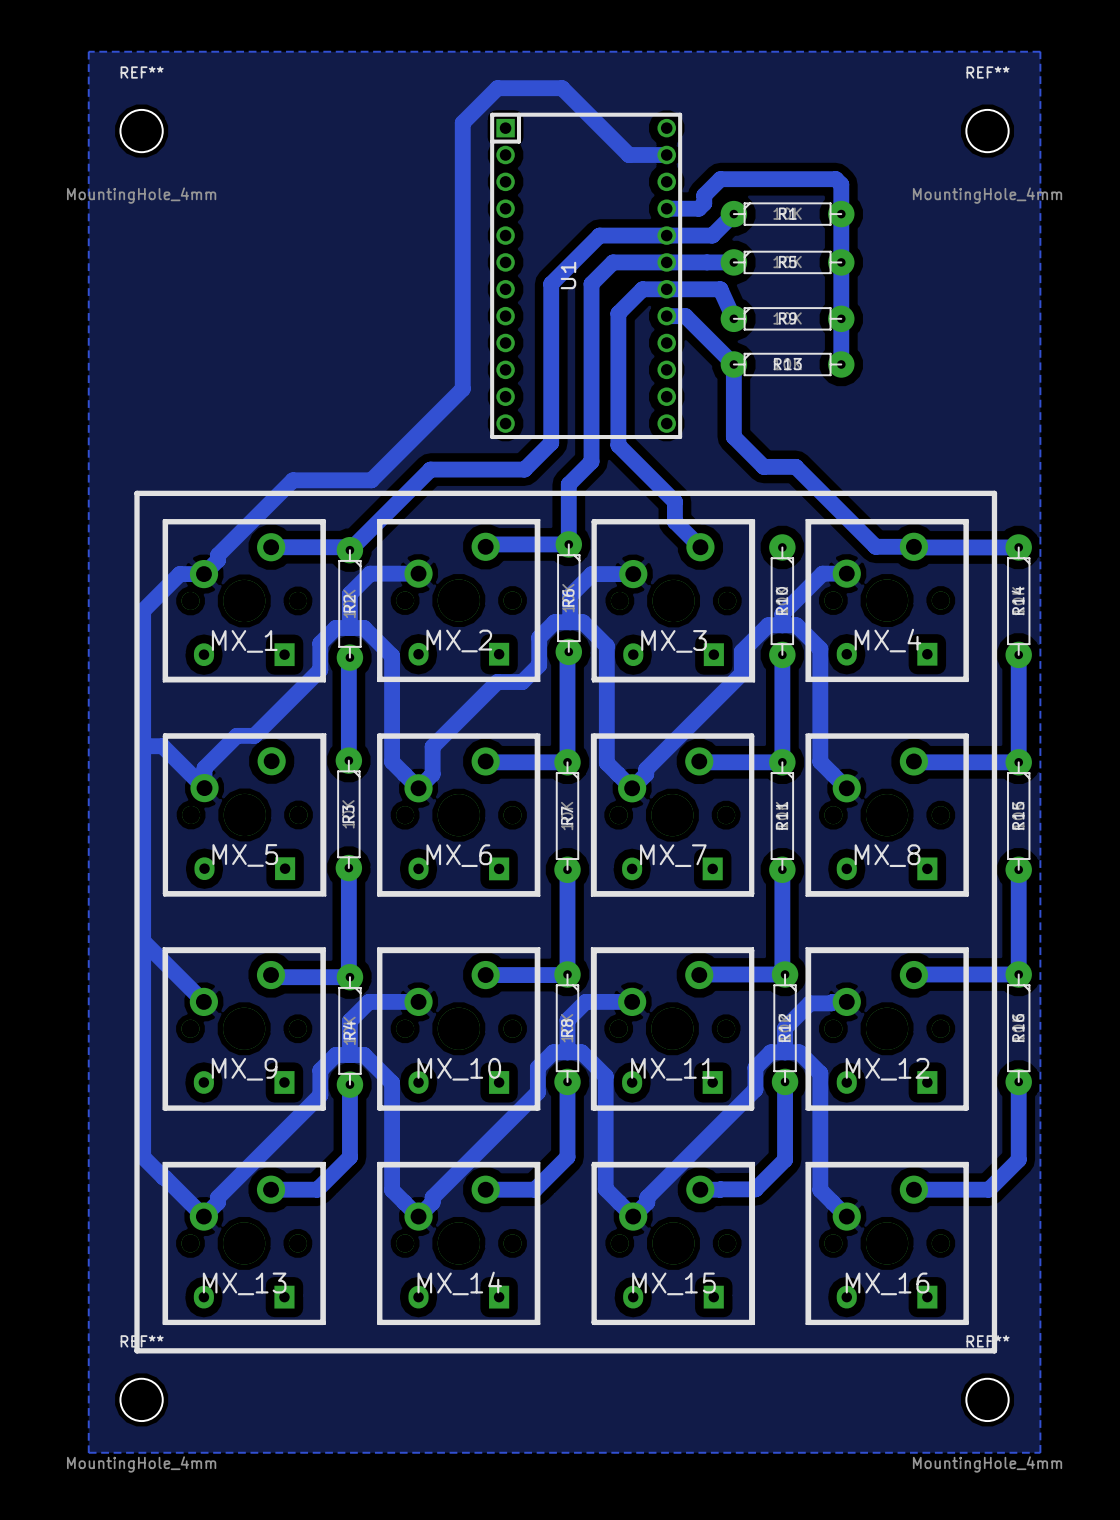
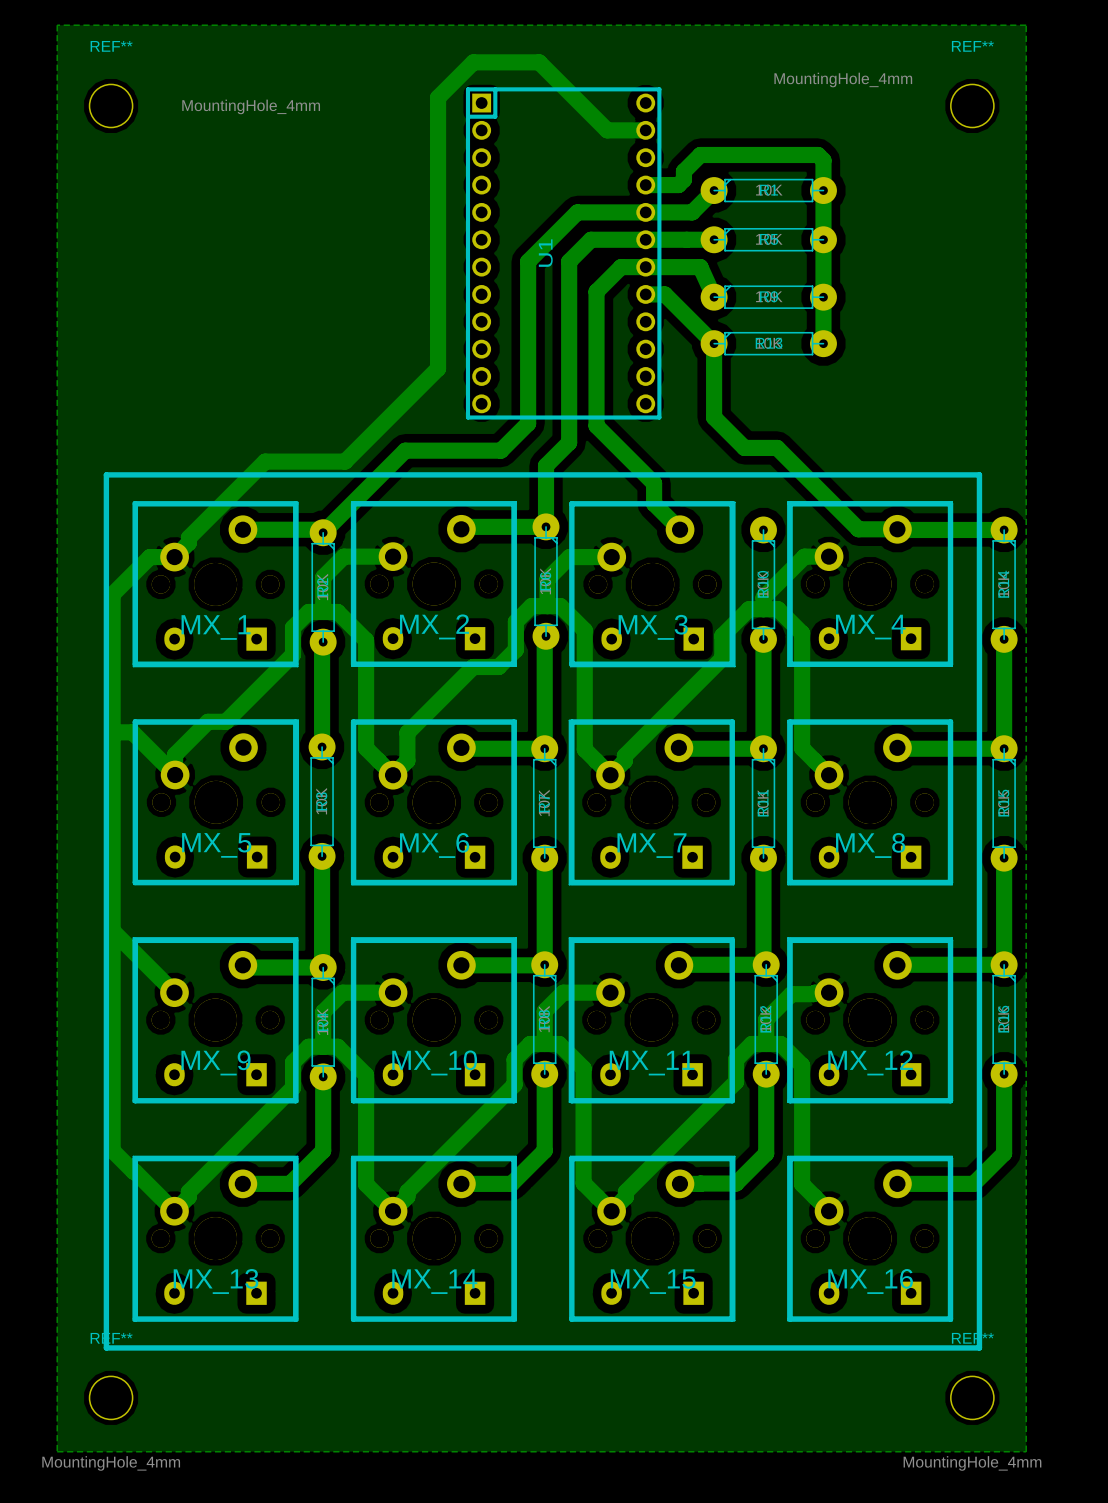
REF** value position: MountingHole_4mm (141, 195) -> MountingHole_4mm (251, 106)
REF** value position: MountingHole_4mm (987, 195) -> MountingHole_4mm (843, 79)

